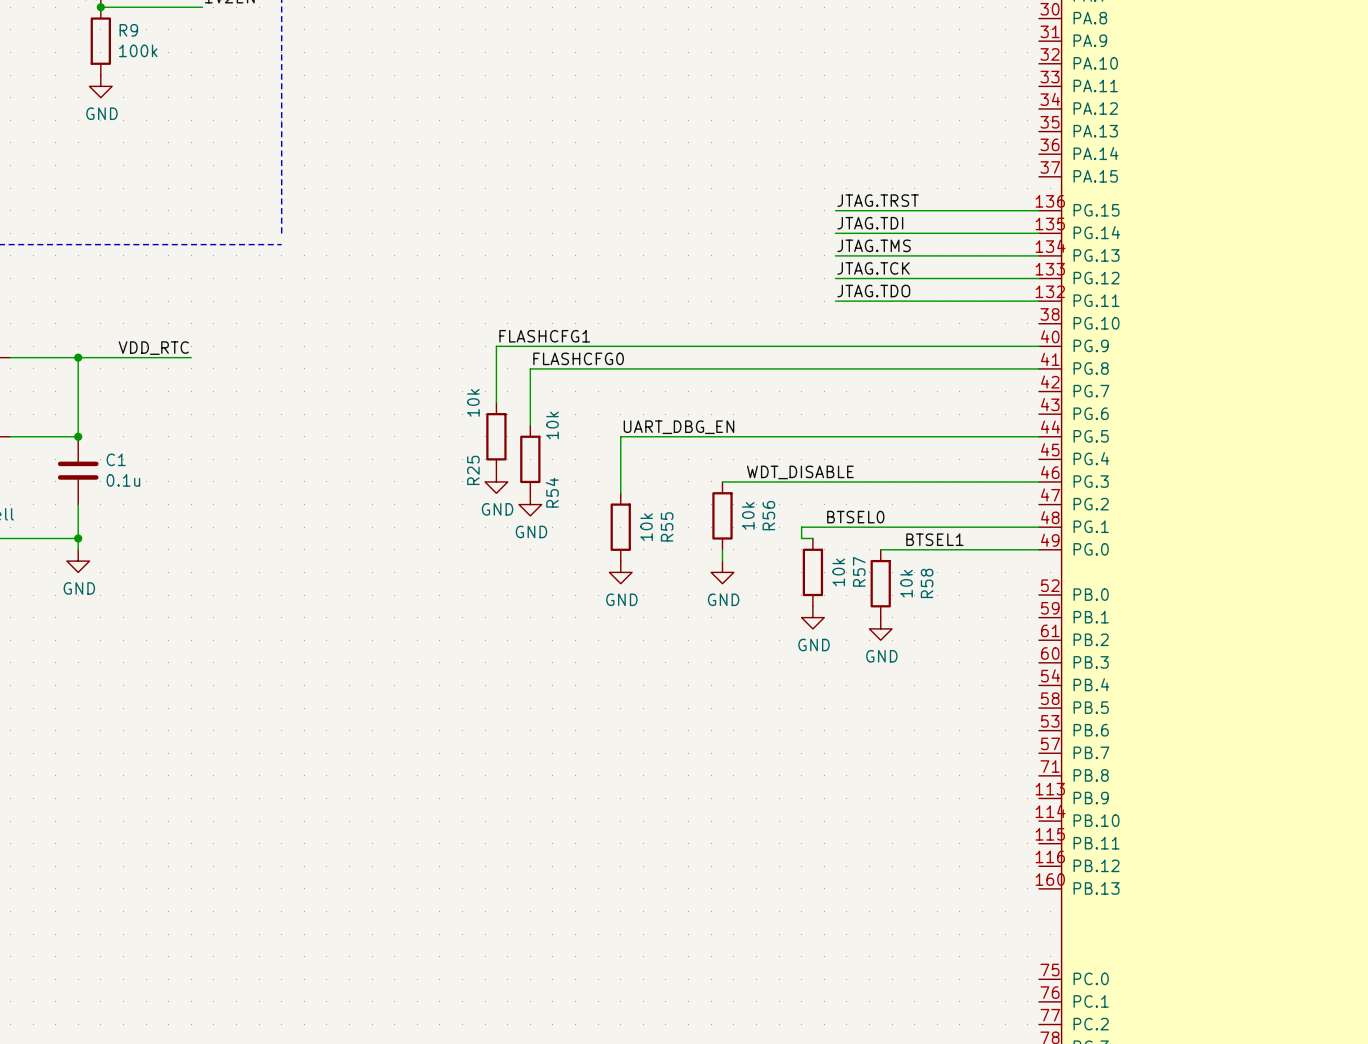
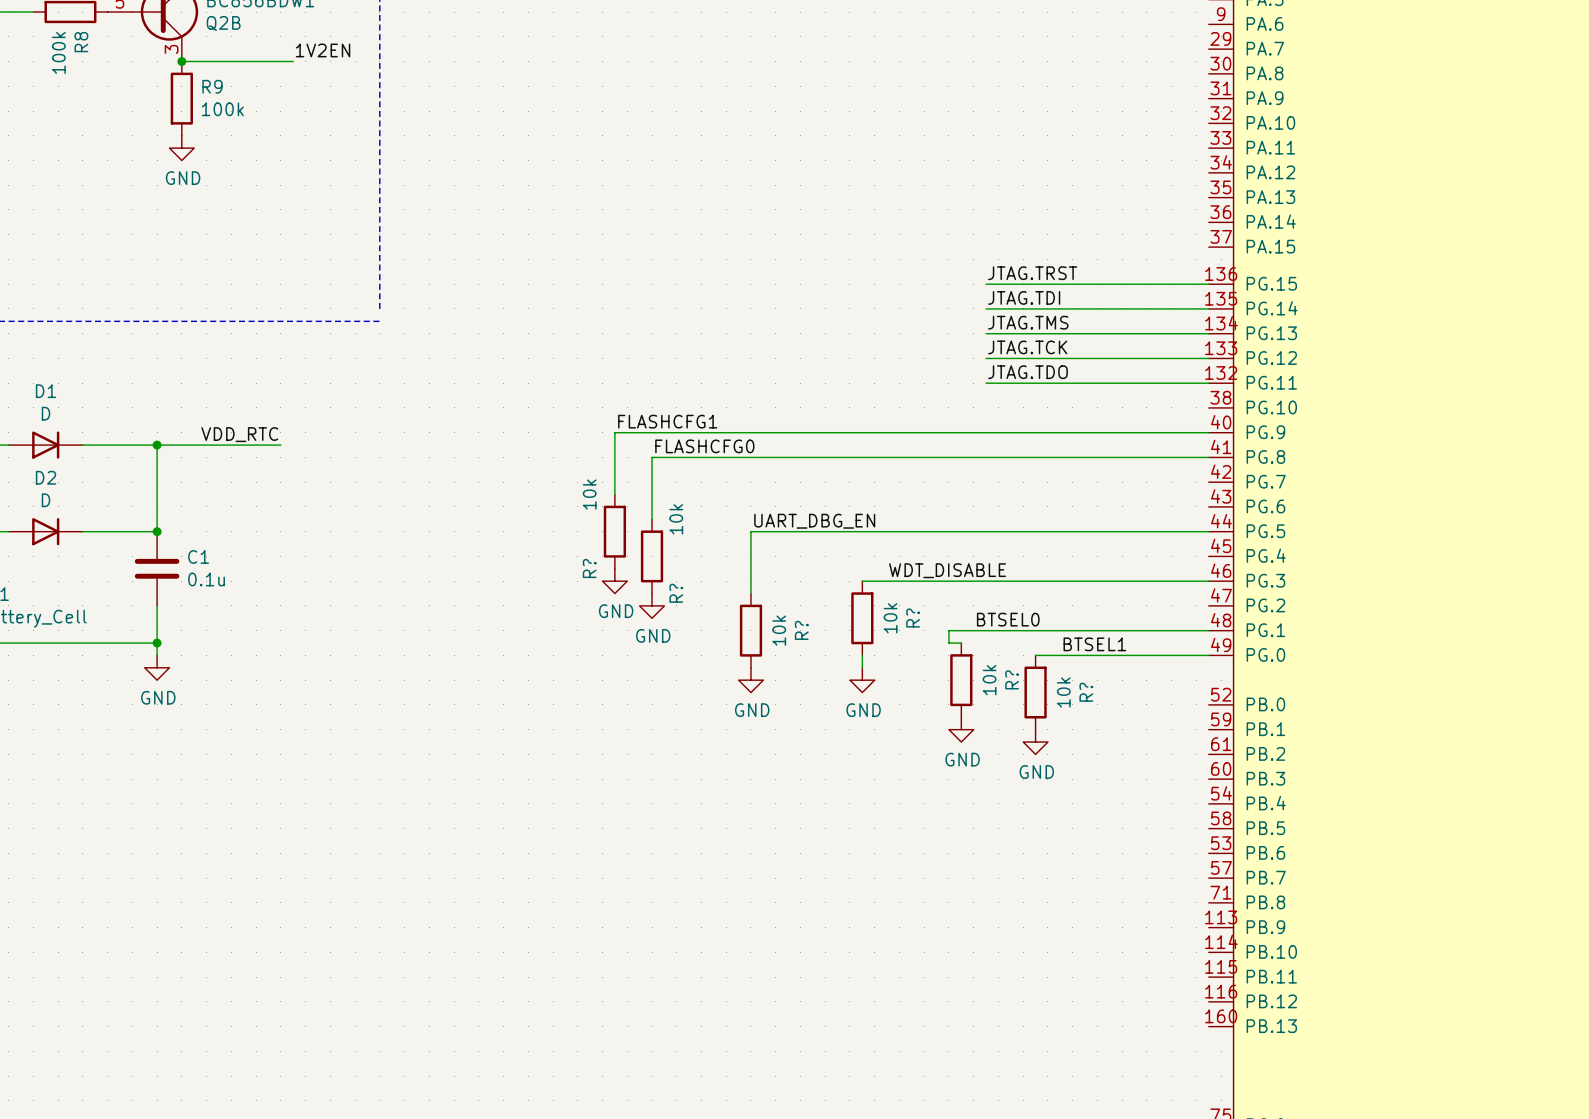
R25 name: R25 (473, 470) -> R? (589, 568)
R54 name: R54 (552, 492) -> R? (676, 593)
R56 name: R56 (768, 515) -> R? (913, 618)
R55 name: R55 (667, 526) -> R? (801, 630)
R57 name: R57 (859, 571) -> R? (1012, 679)
R58 name: R58 (927, 583) -> R? (1086, 692)

